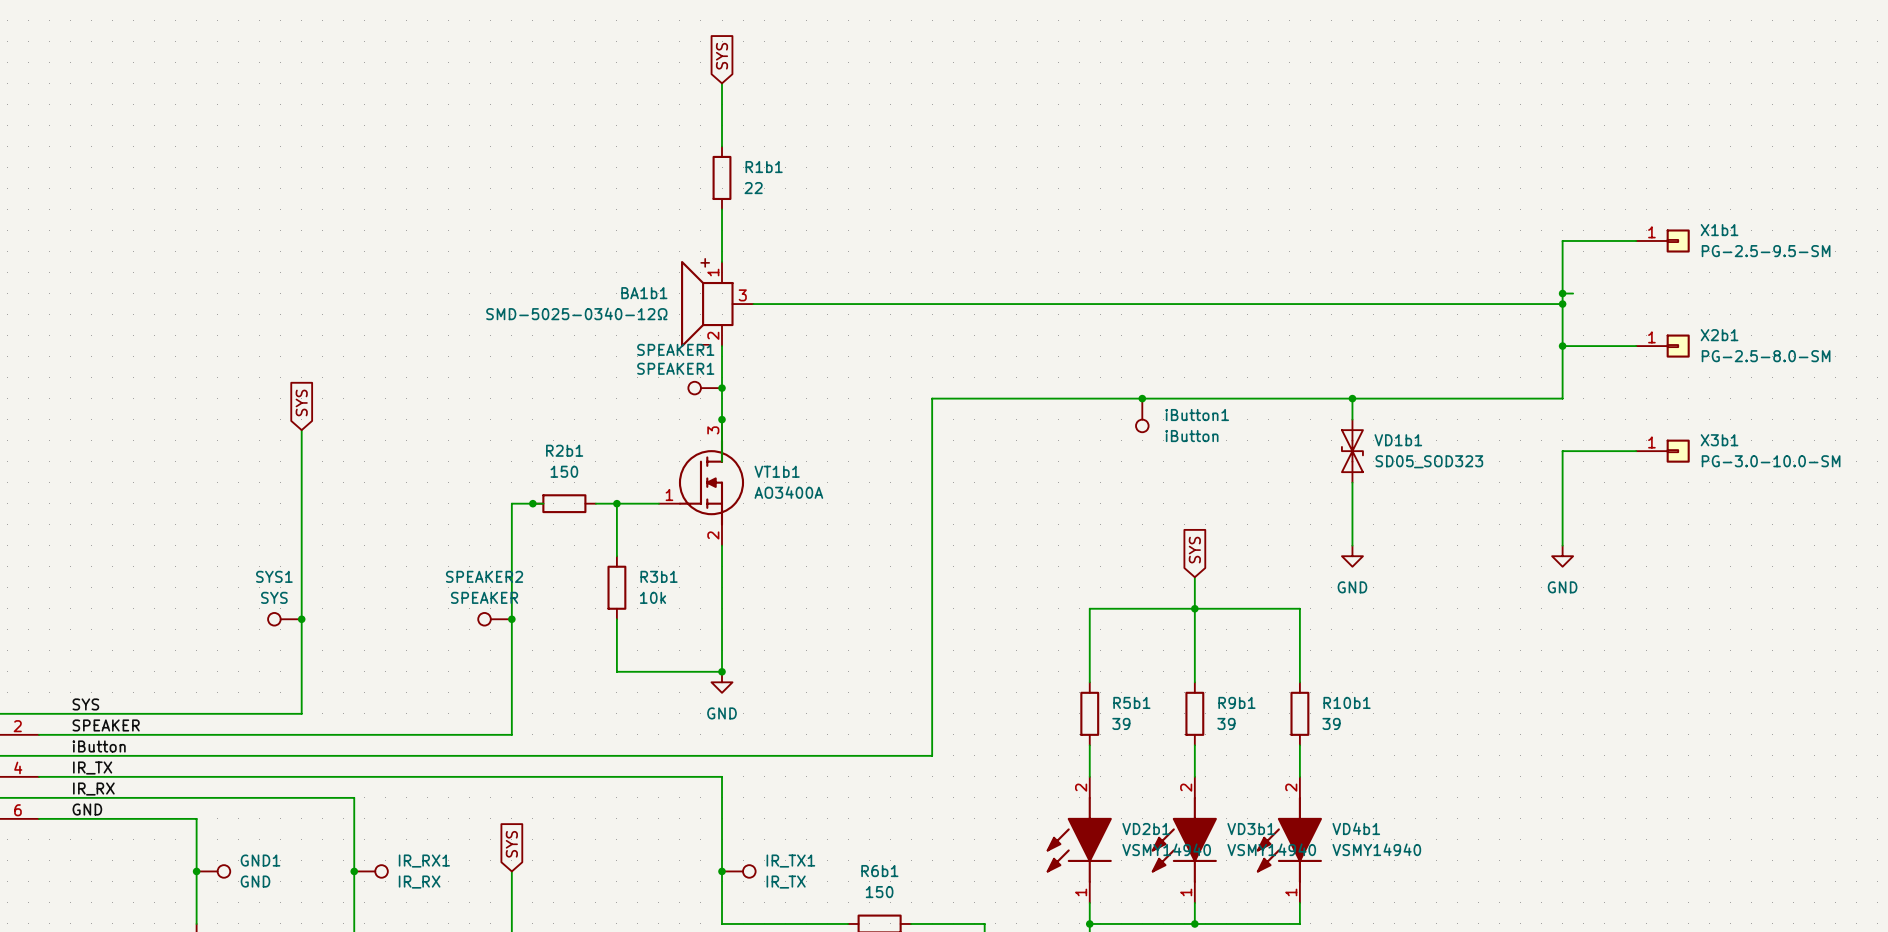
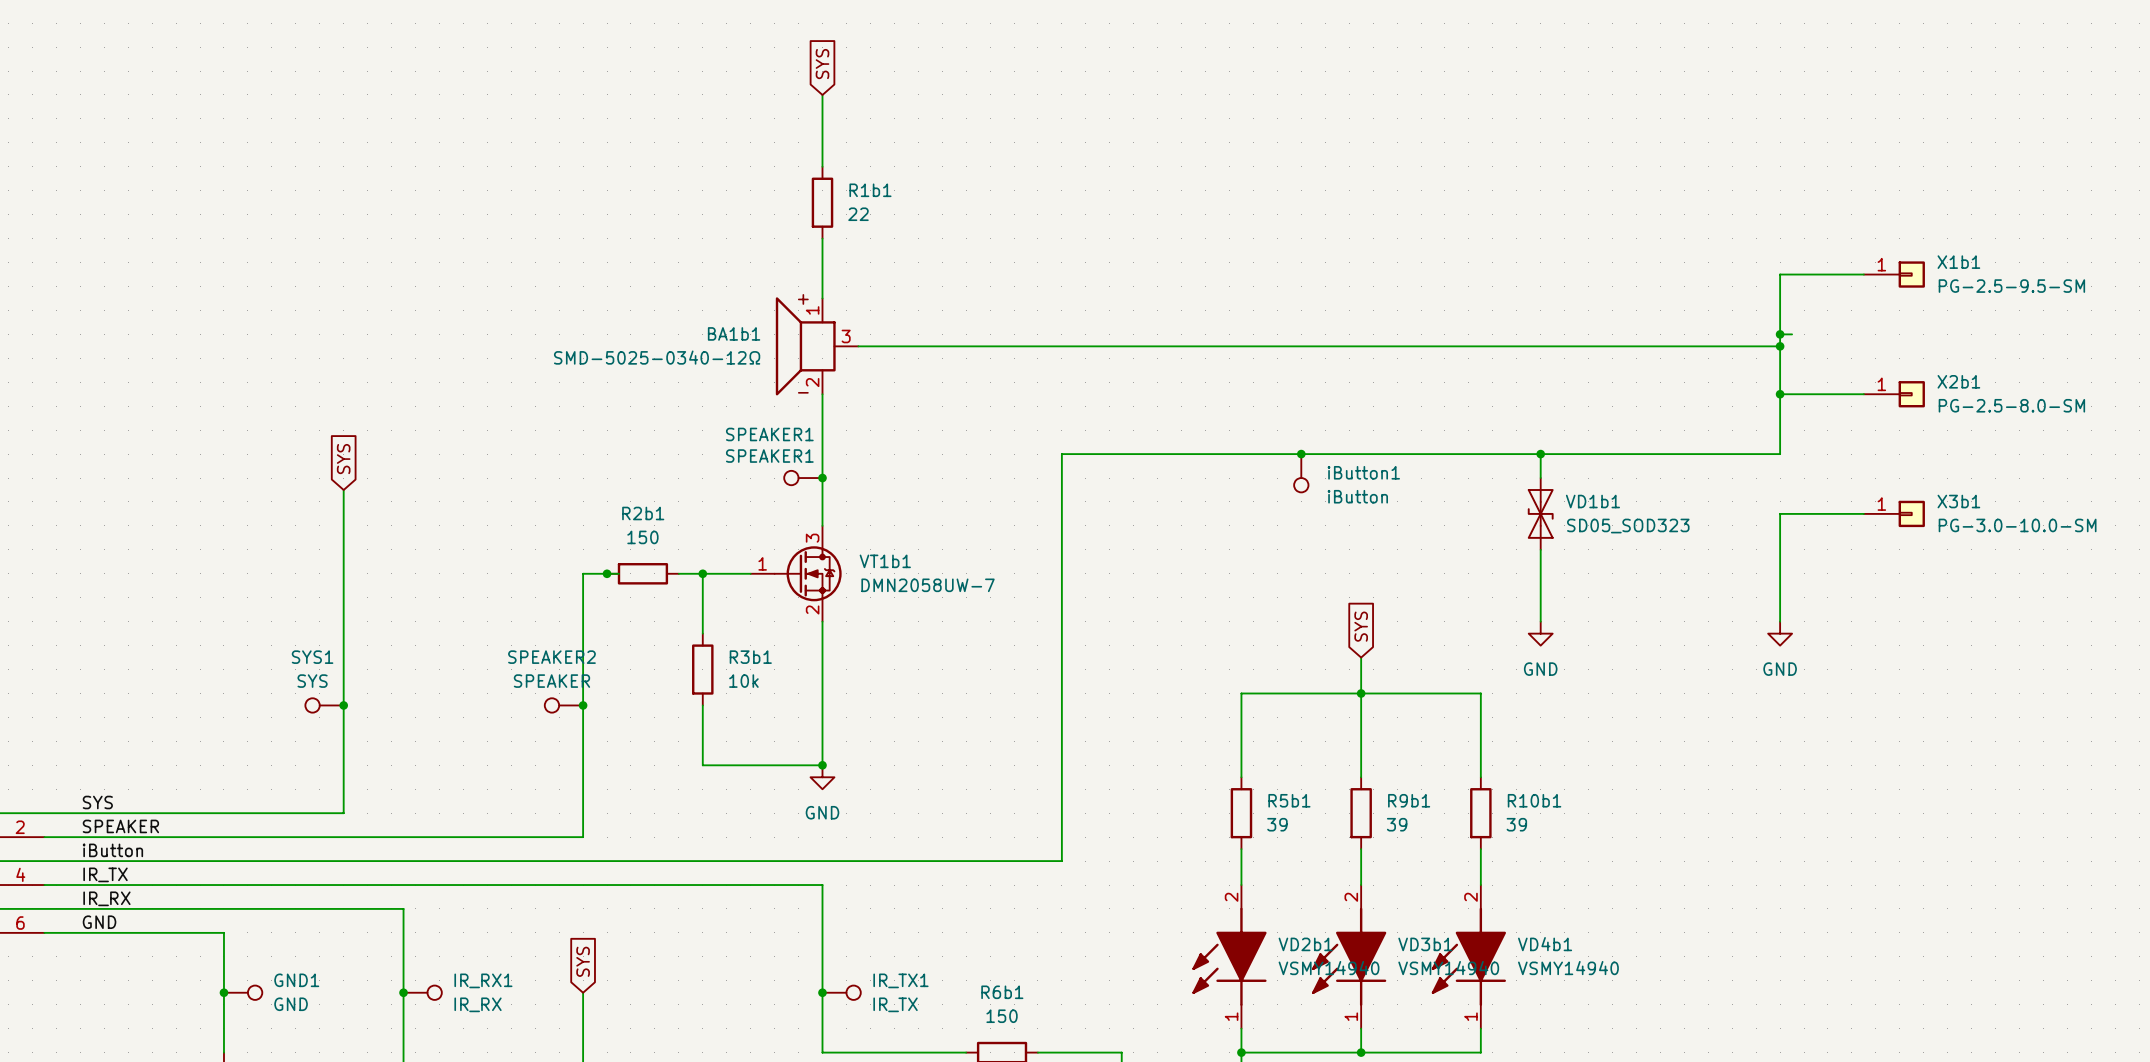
SPEAKER1 position: (705, 388) -> (803, 478)
junction: (722, 388) -> none
VT1b1 symbol: [658, 419, 745, 546] -> [750, 525, 842, 622]
VT1b1 value: AO3400A (788, 492) -> DMN2058UW-7 (928, 585)

